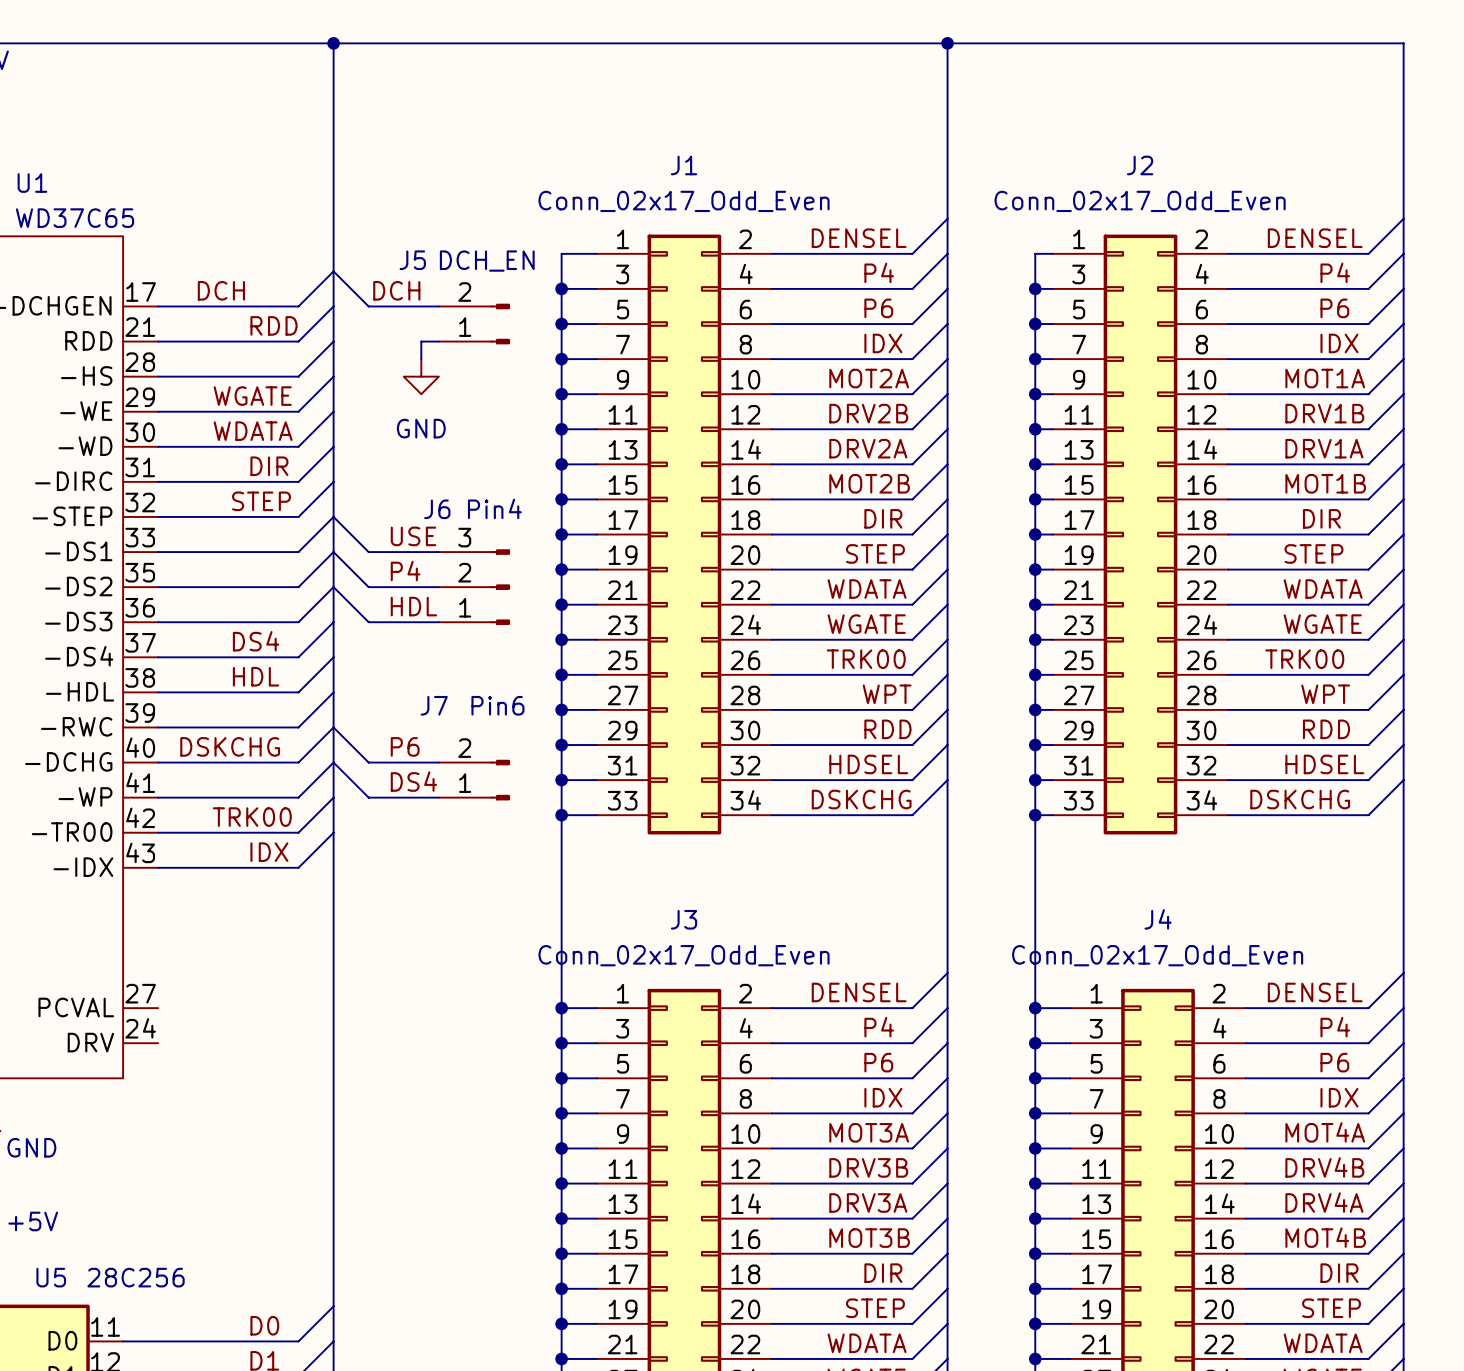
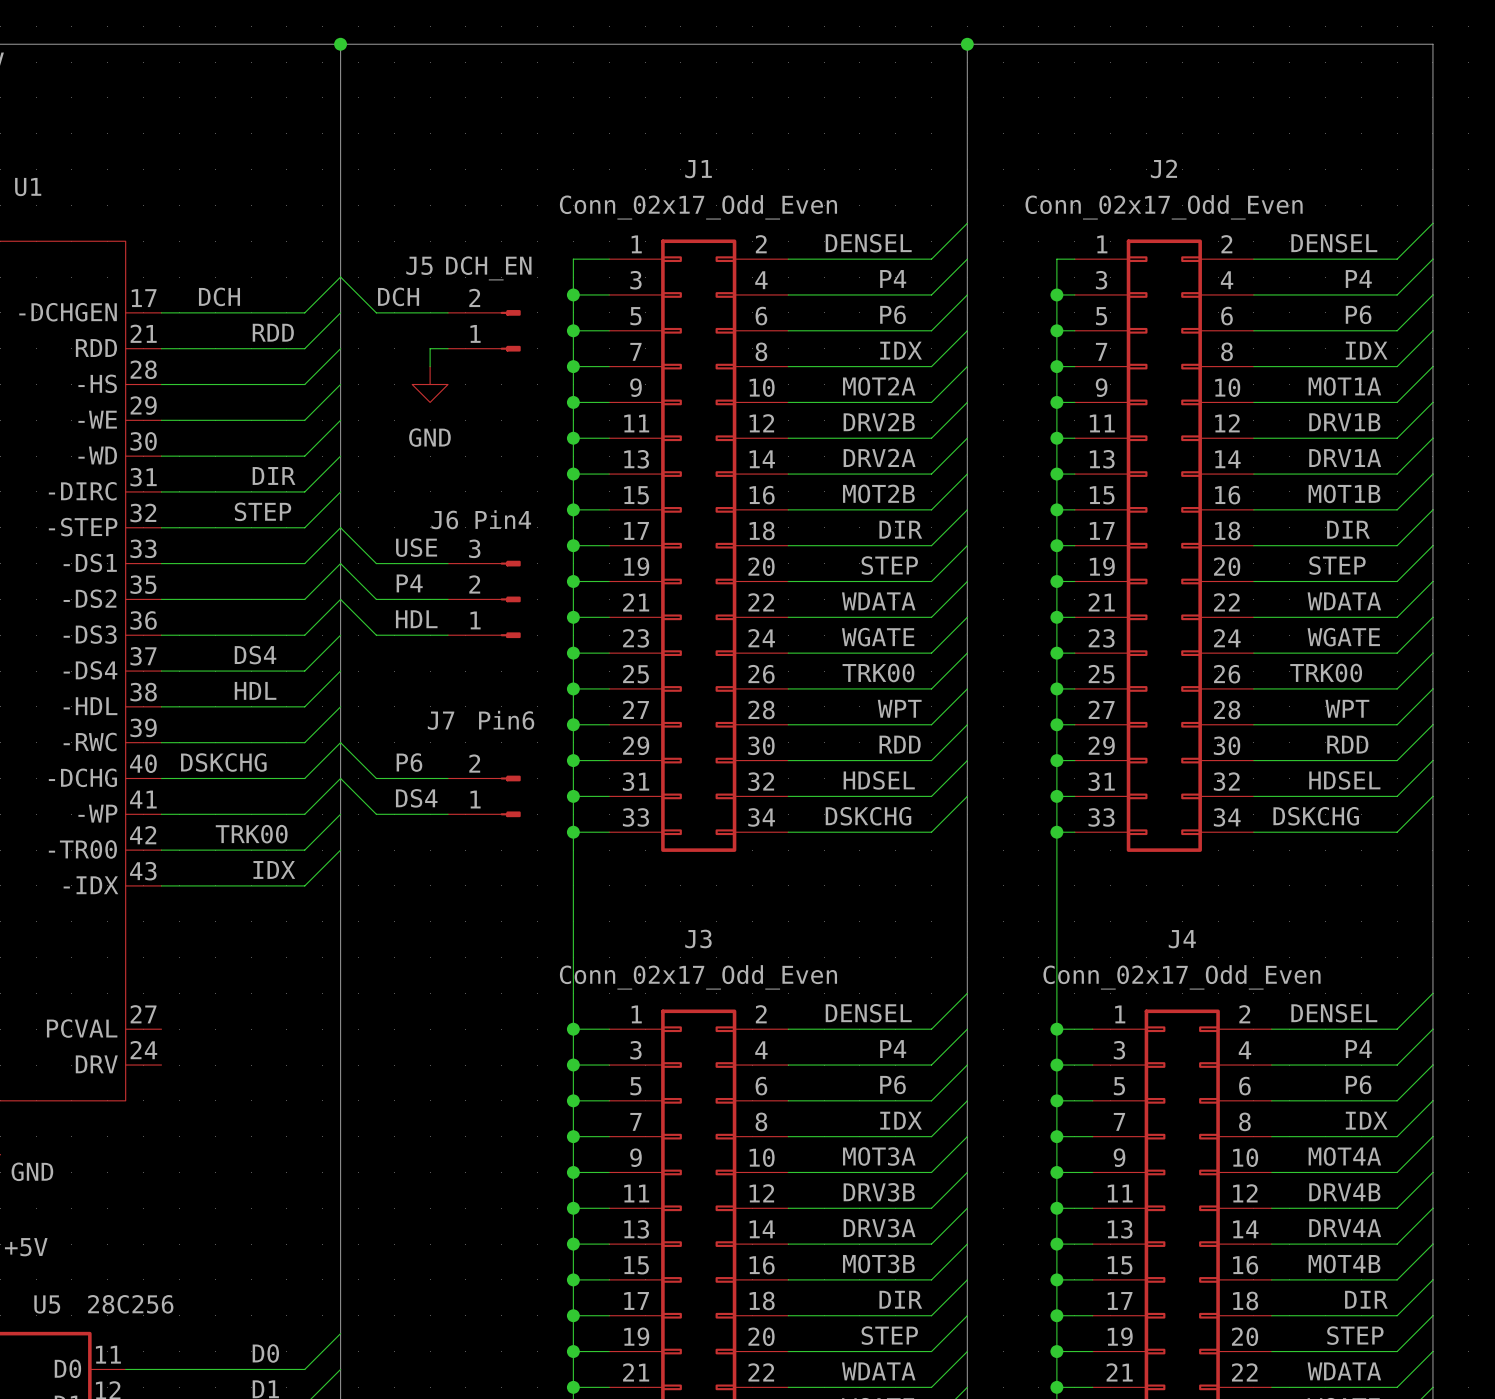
U1 value: WD37C65 (75, 218) -> none
label: WGATE (252, 396) -> none
label: WDATA (253, 431) -> none

